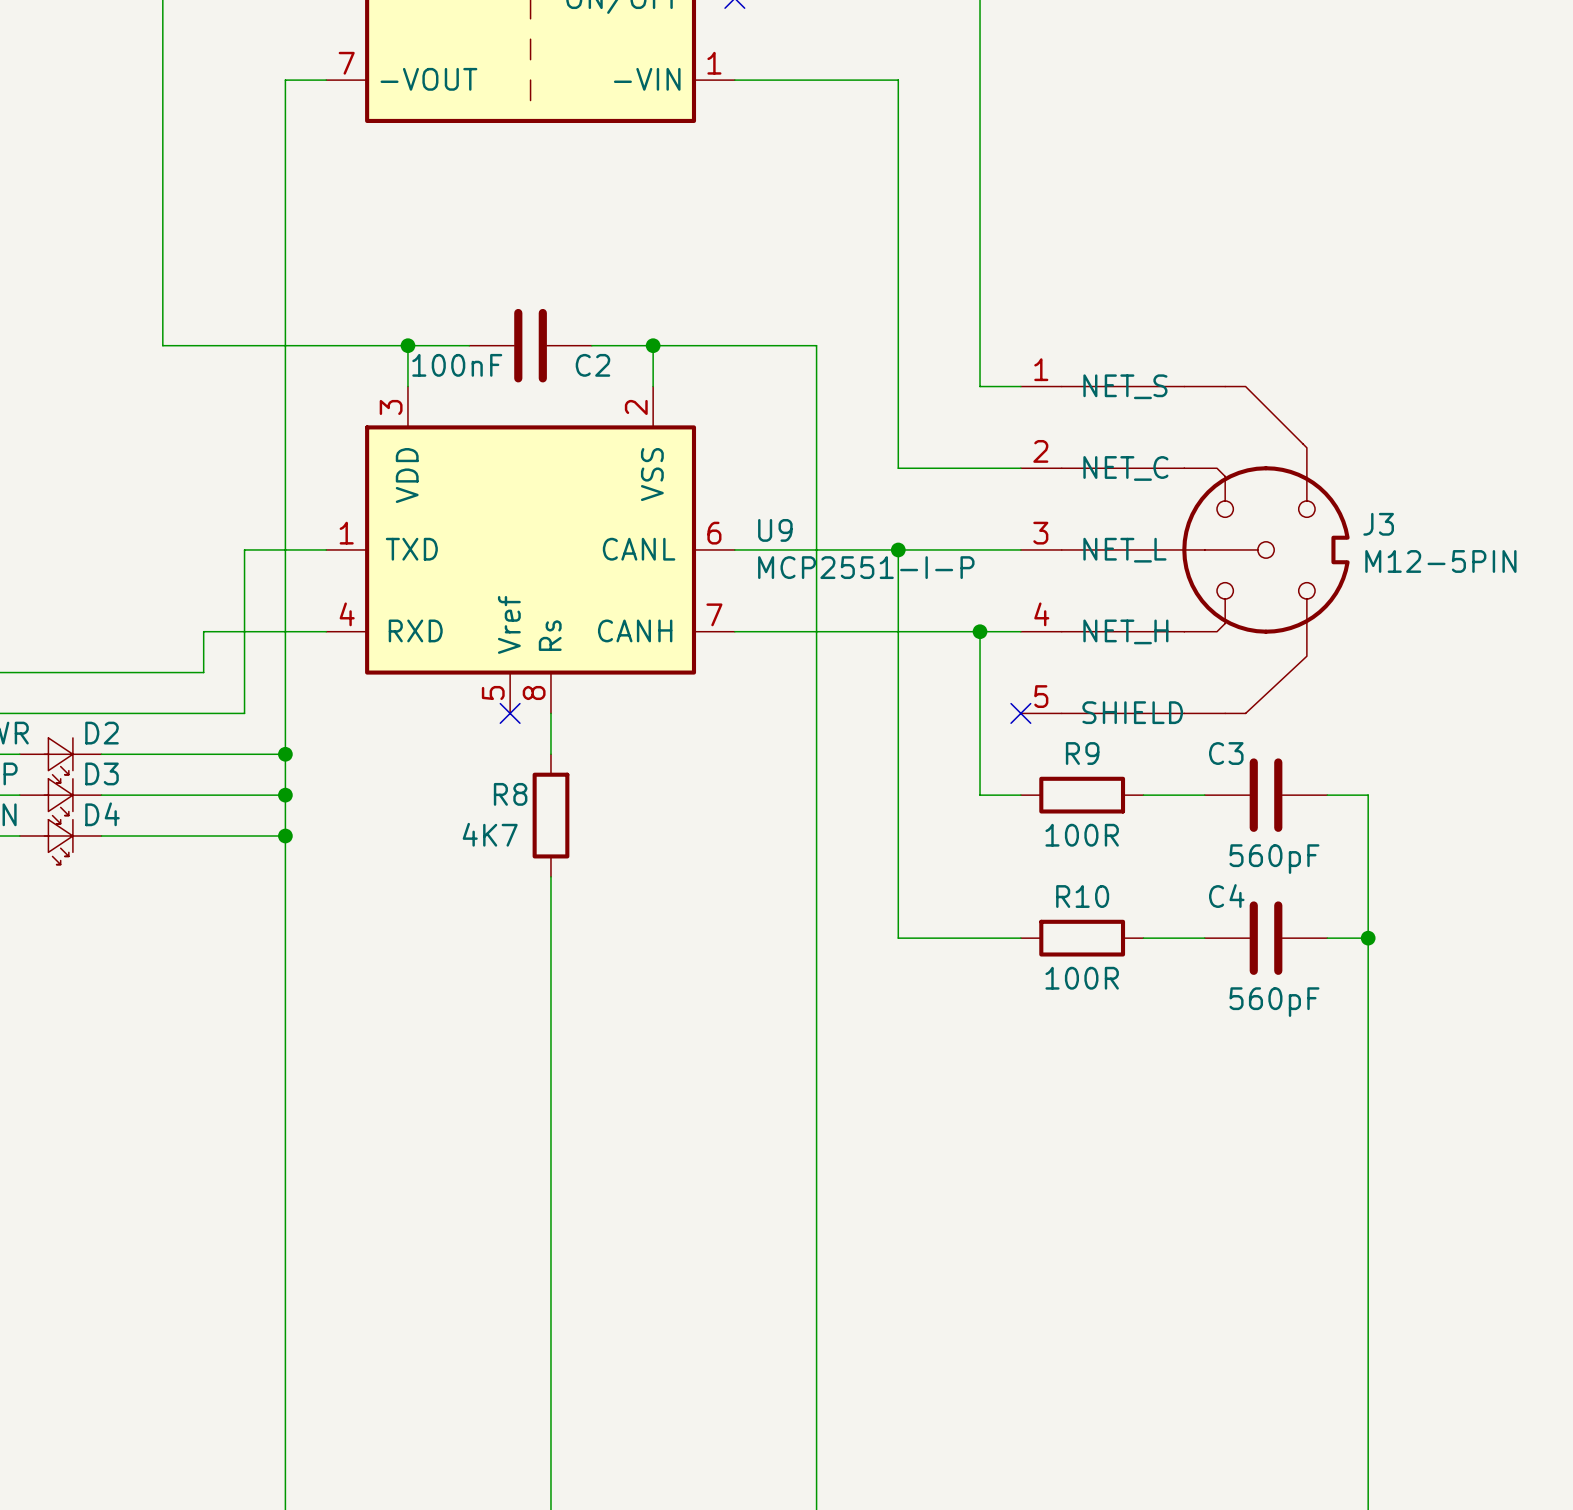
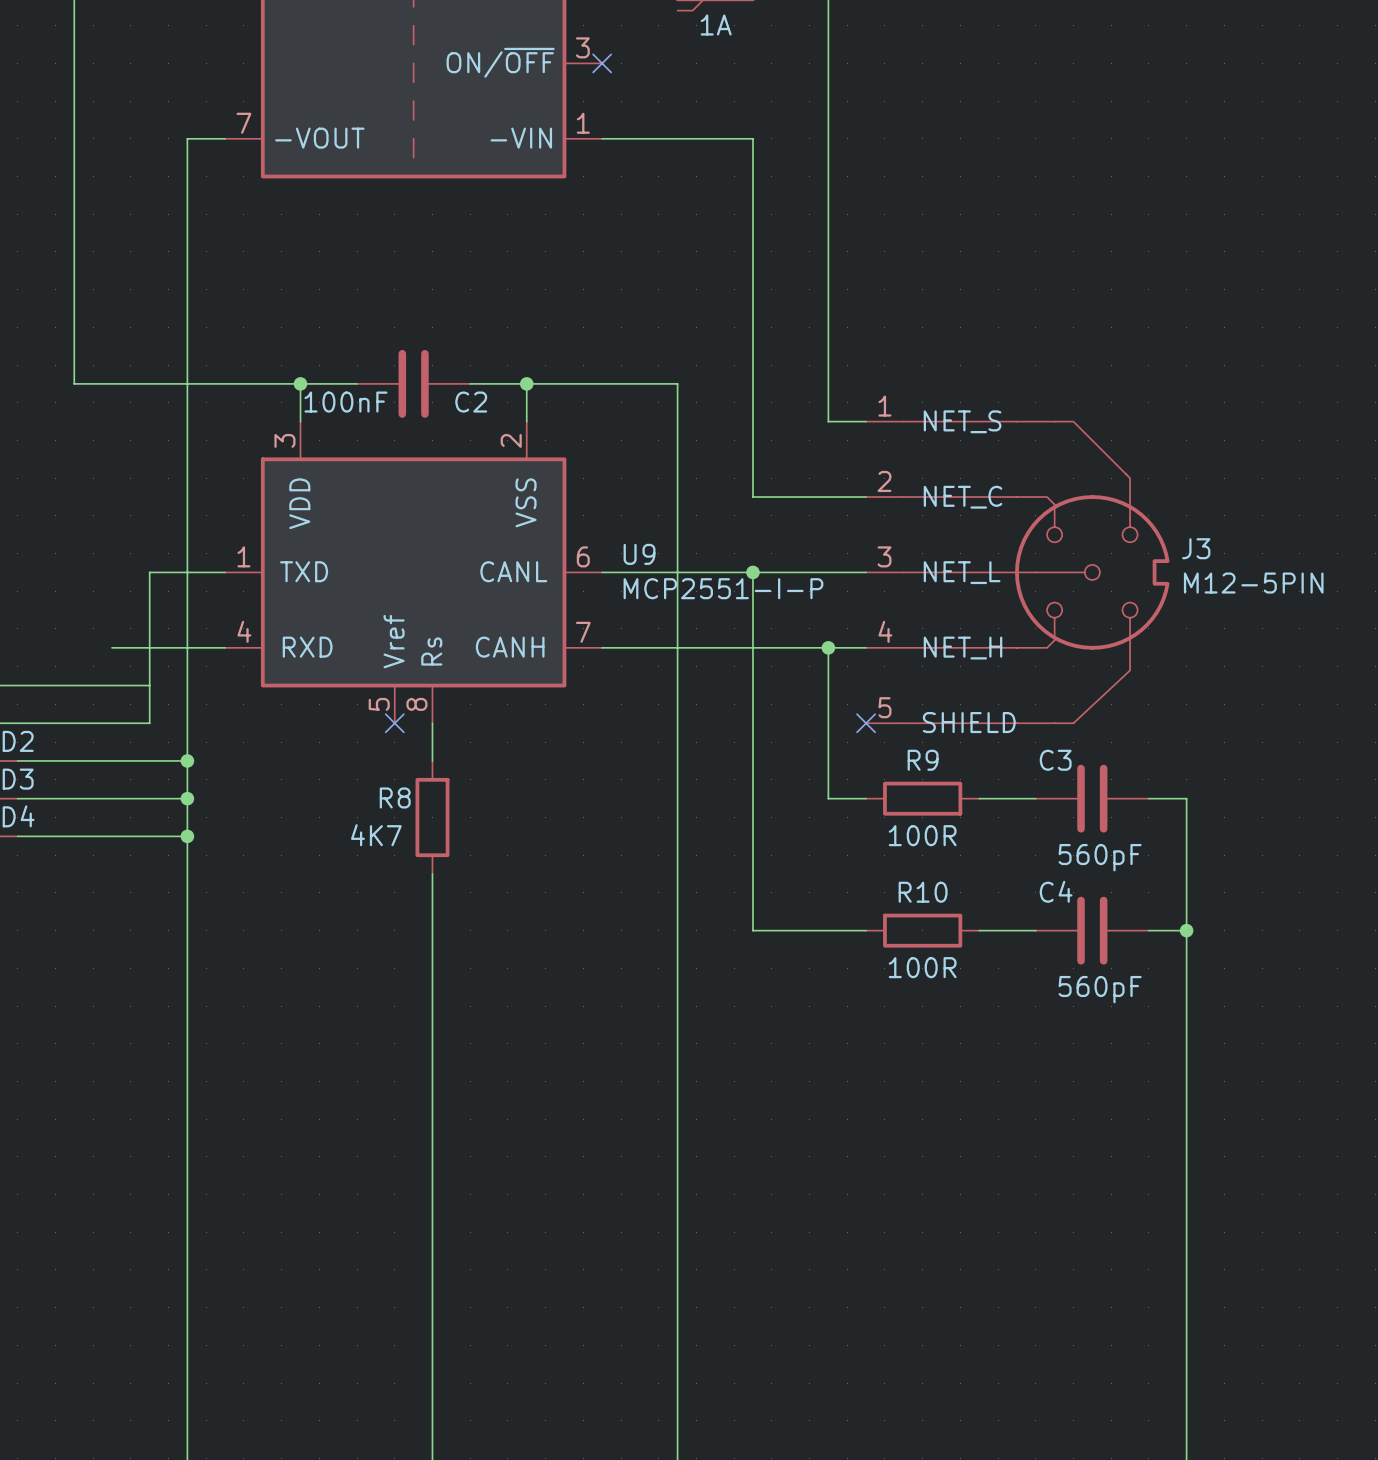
wire: (203, 631) (203, 672) -> (149, 685) (111, 685)

